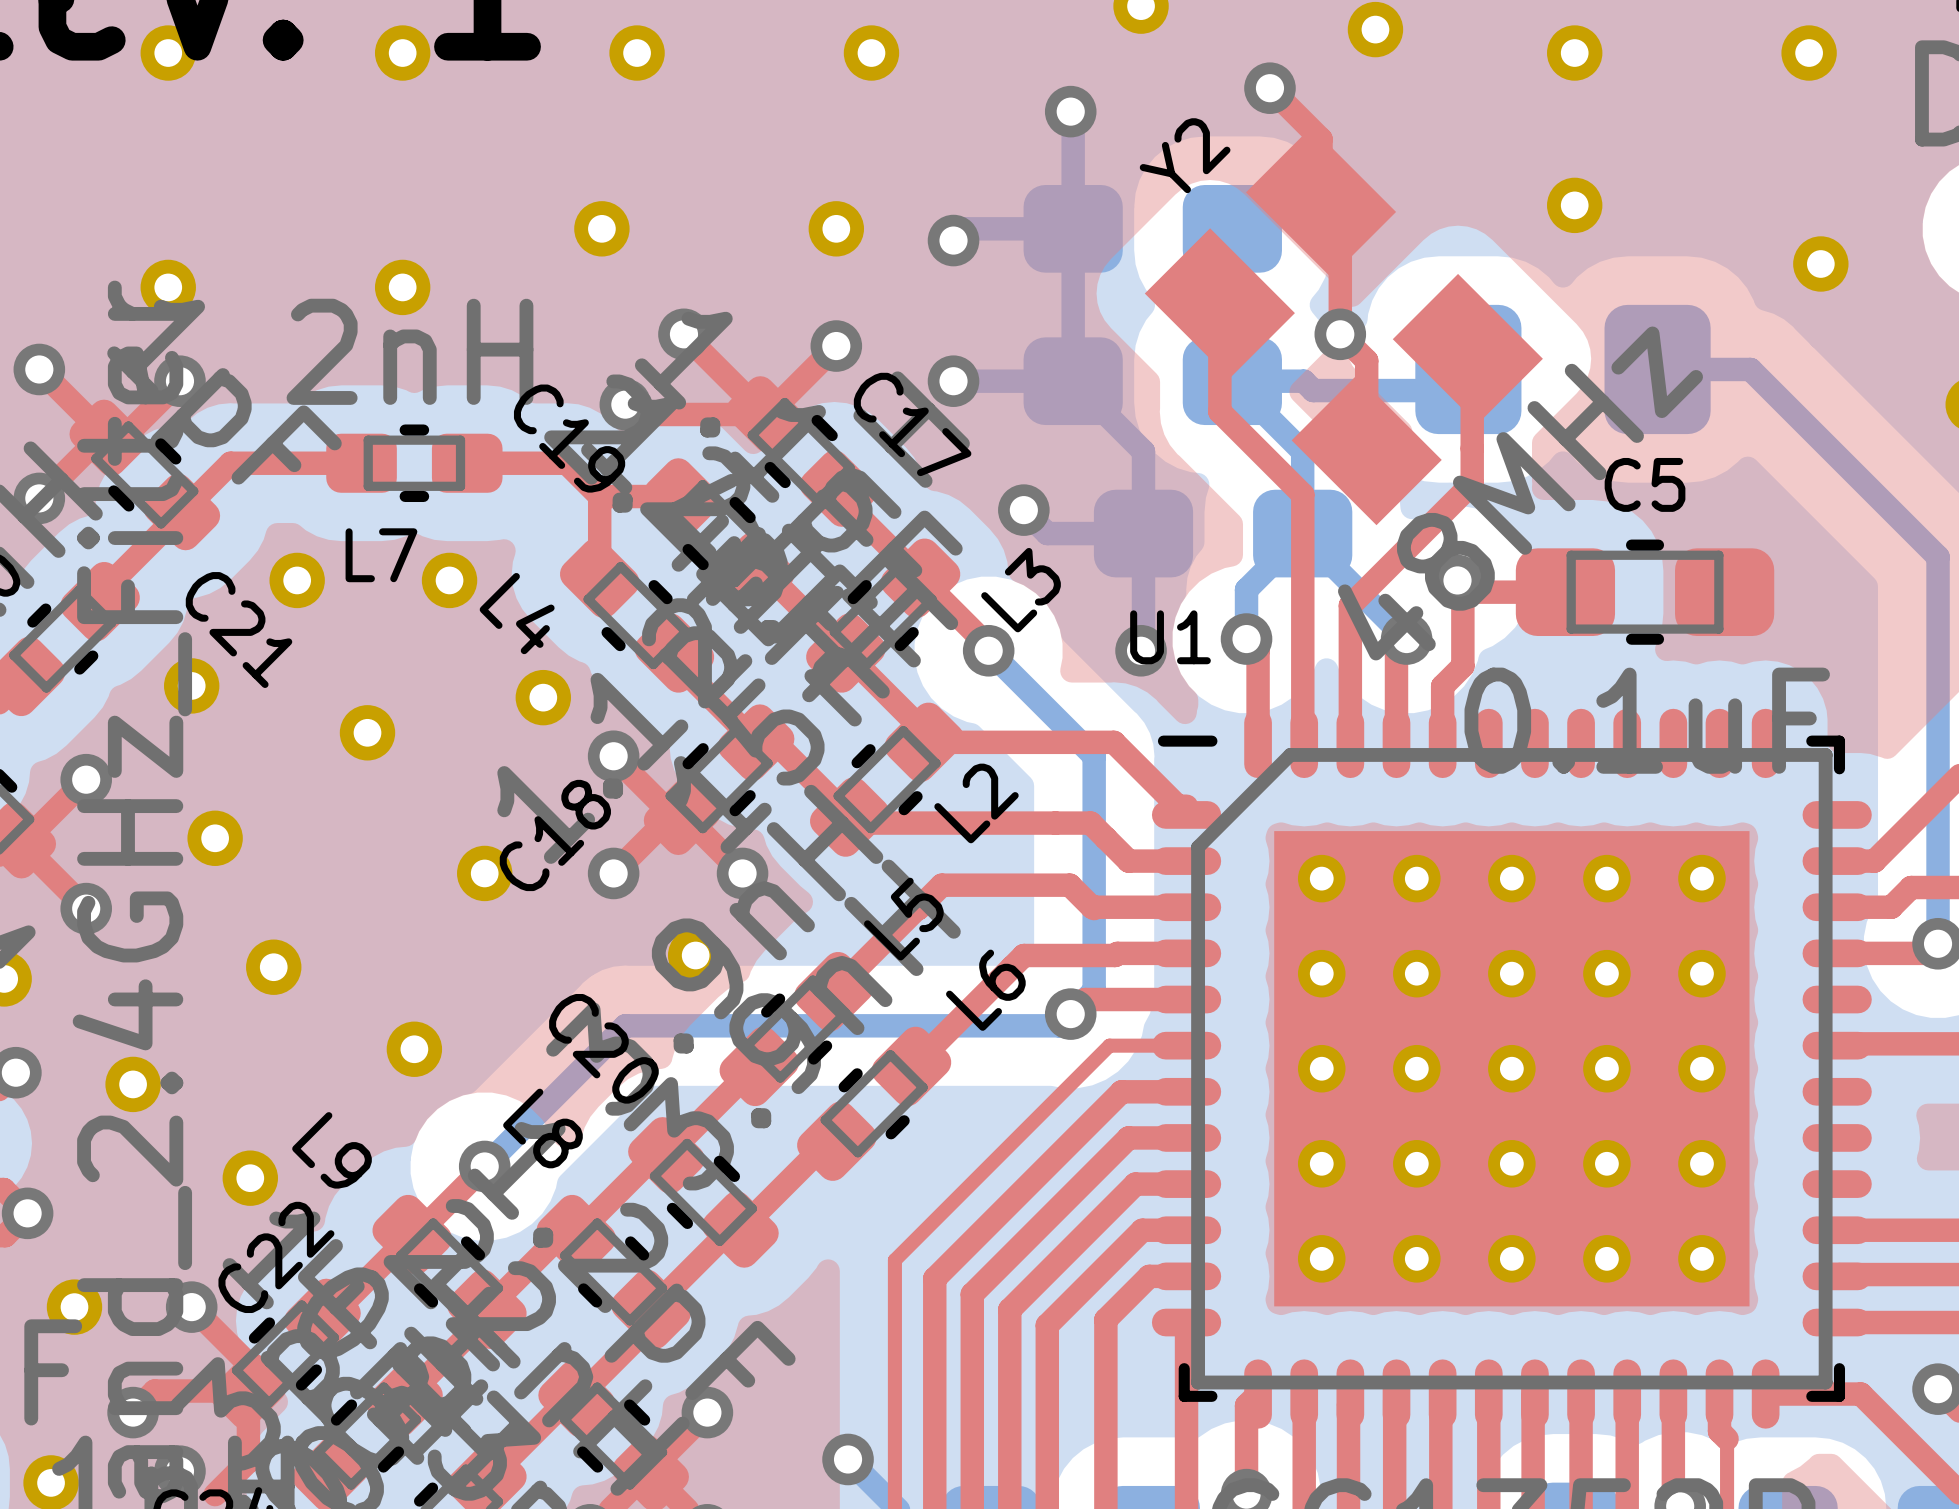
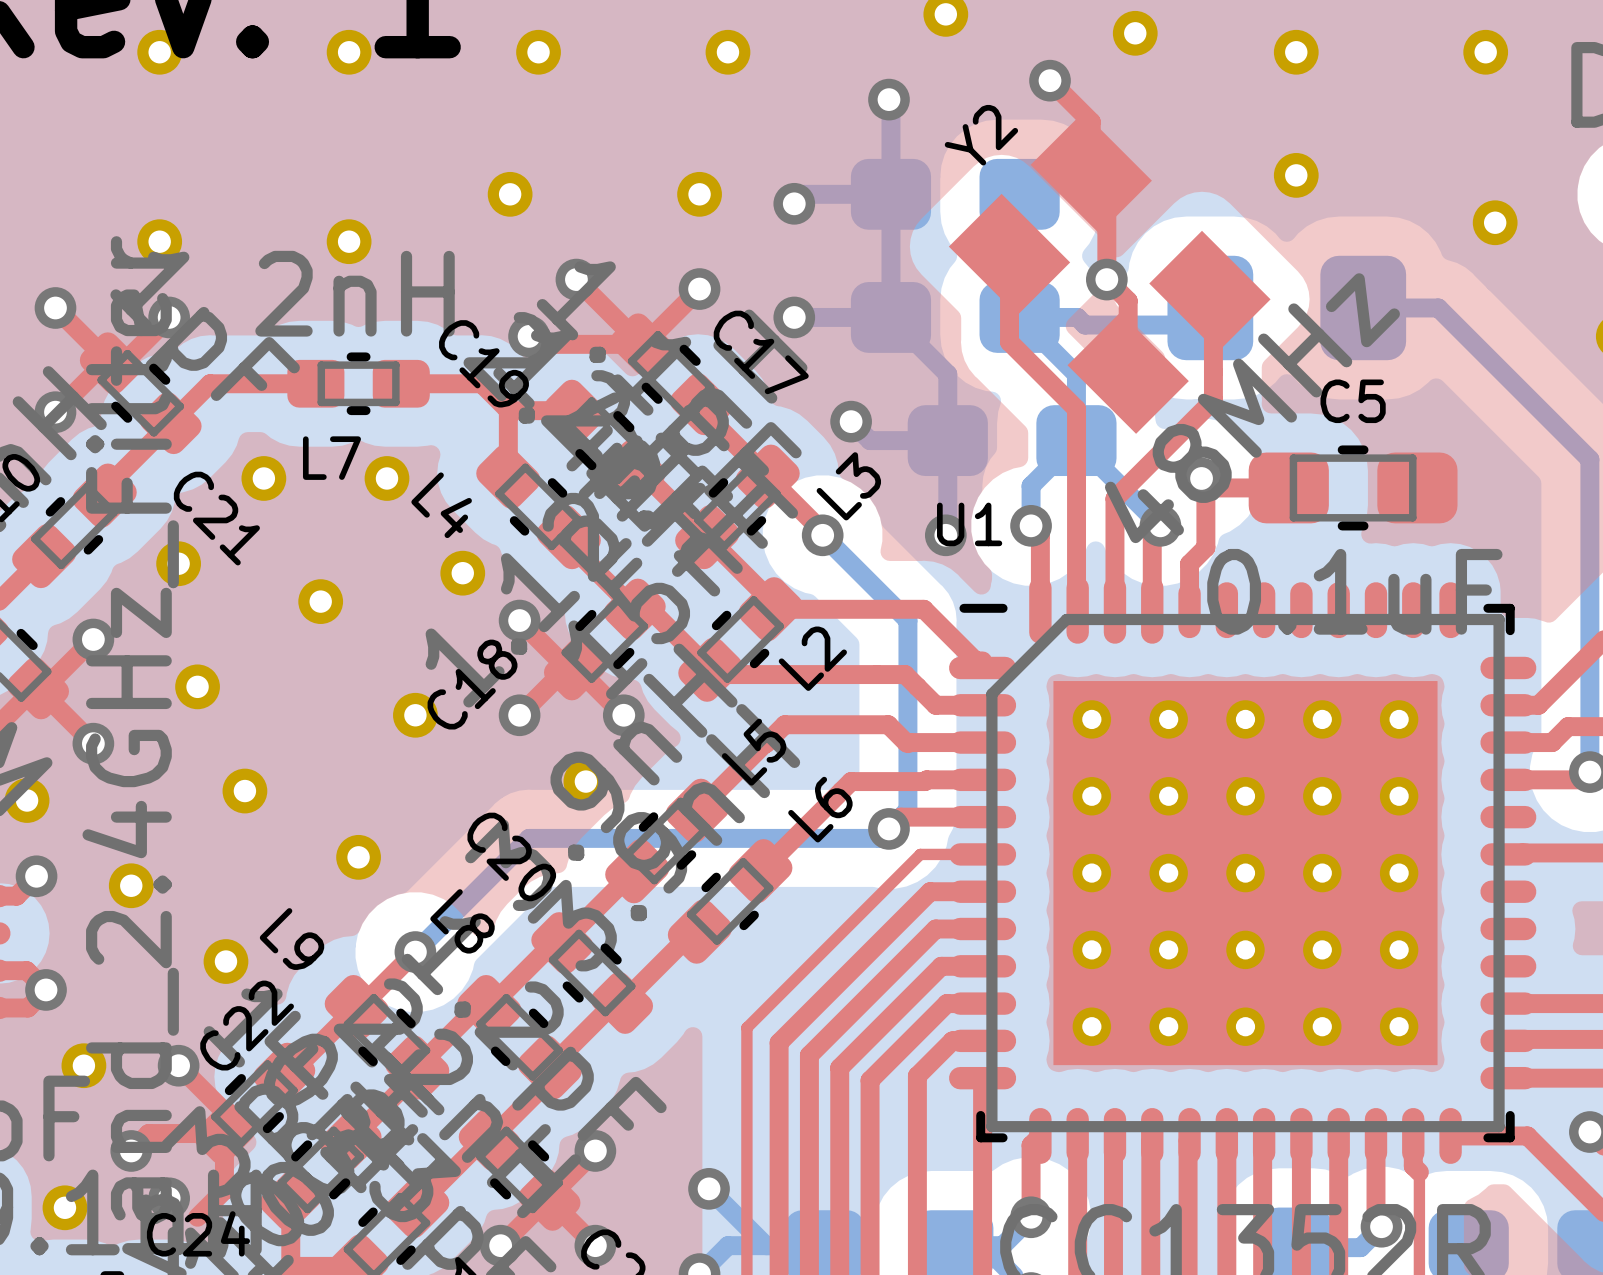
U1 footprint: [1151, 708, 1872, 1429] -> [949, 576, 1537, 1164]

